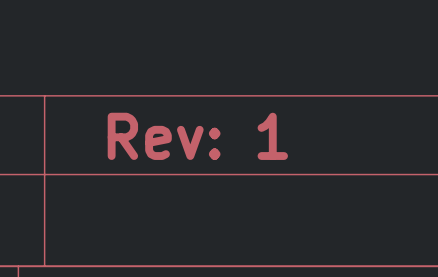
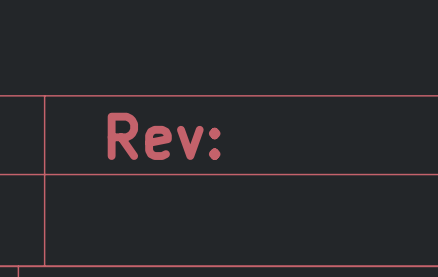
title block: Rev: 1 (197, 136) -> Rev: (164, 136)

